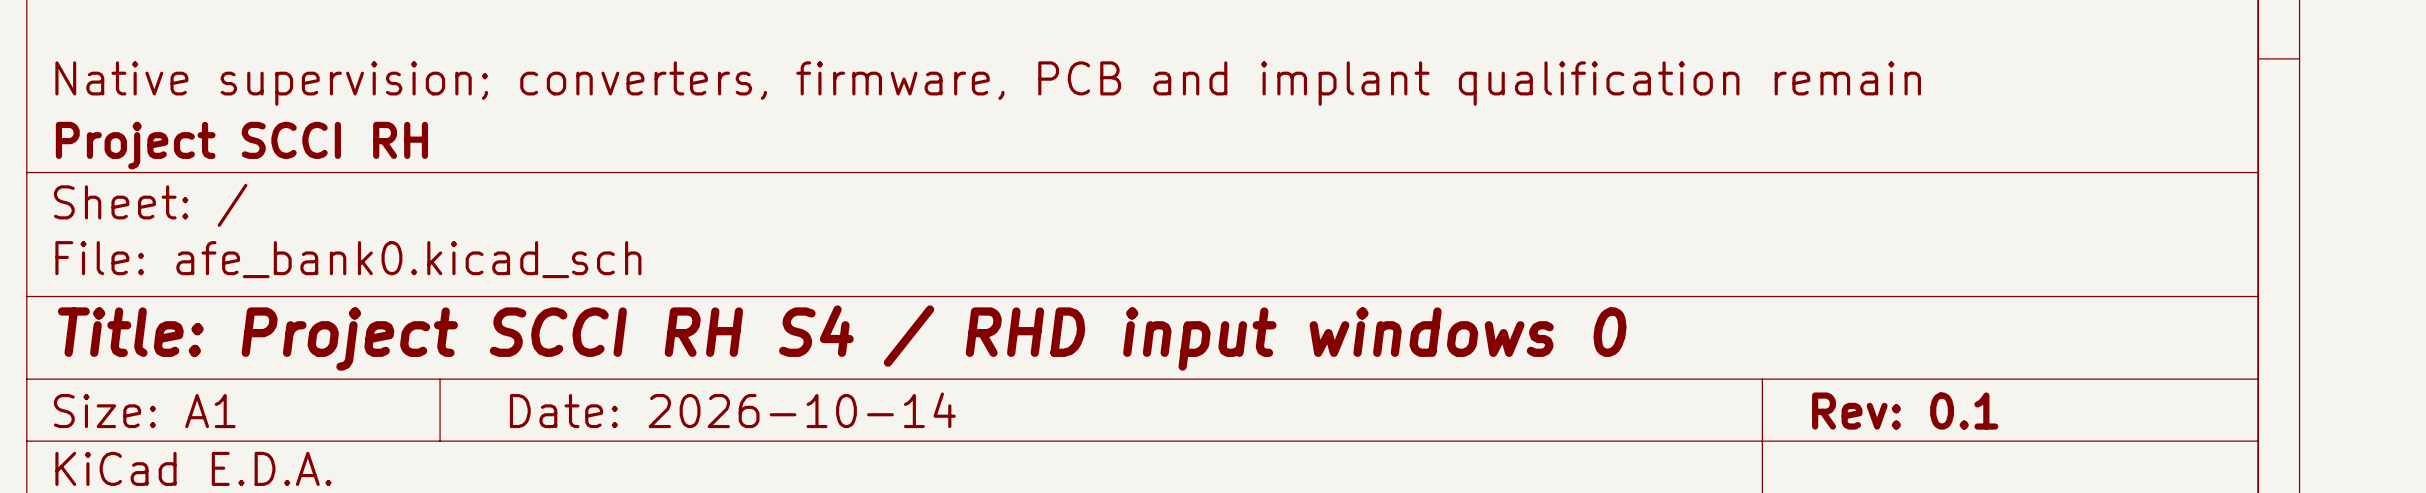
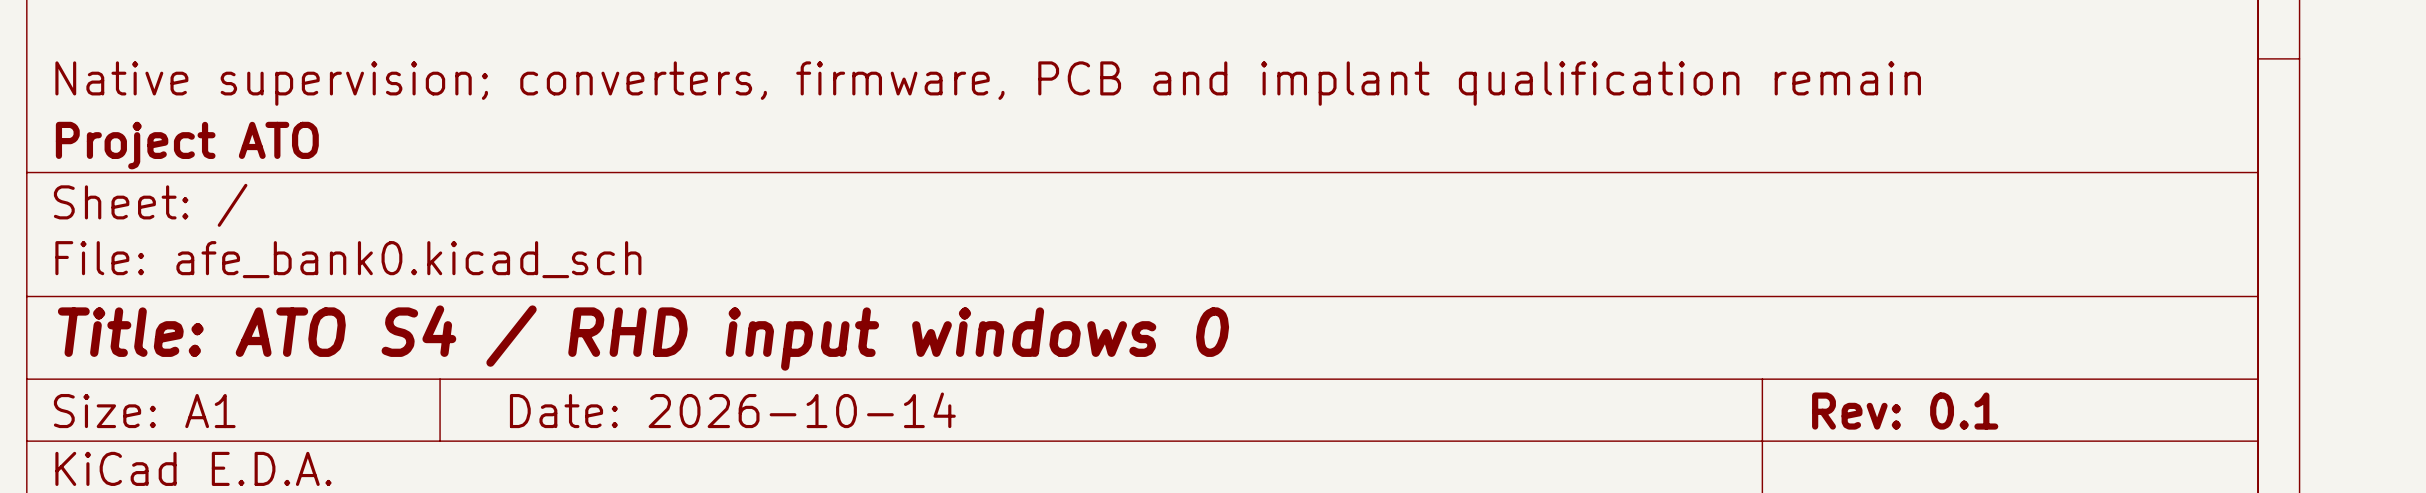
title block: Project SCCI RH (241, 145) -> Project ATO (187, 145)
title block: Title: Project SCCI RH S4 / RHD input windows 0 (842, 338) -> Title: ATO S4 / RHD input windows 0 (643, 338)

